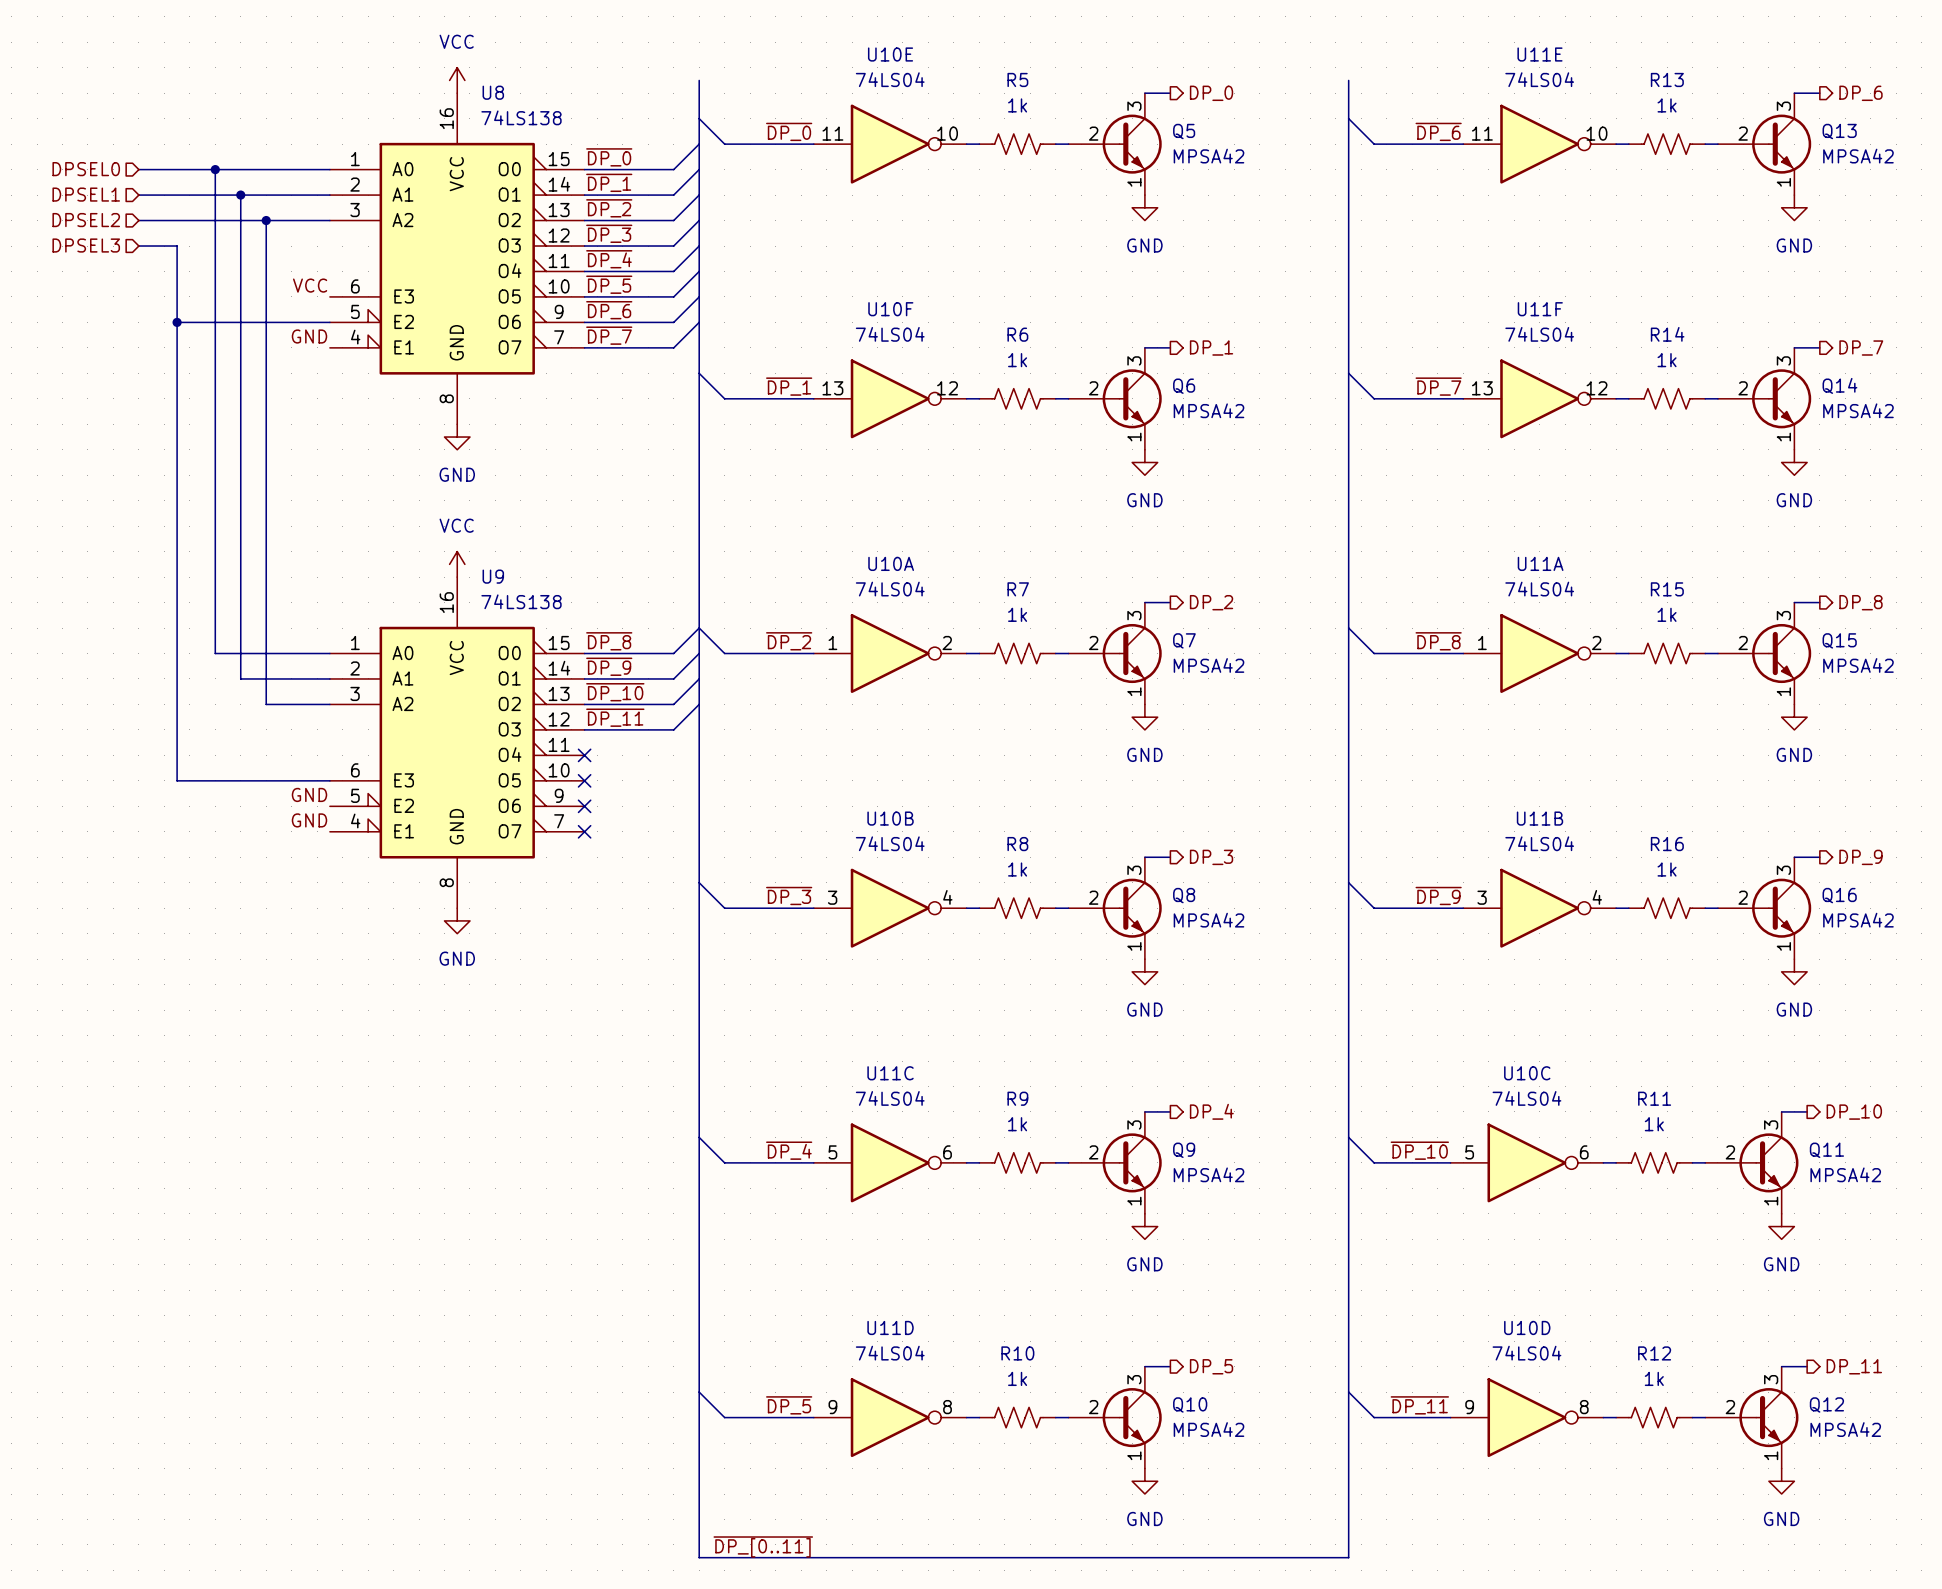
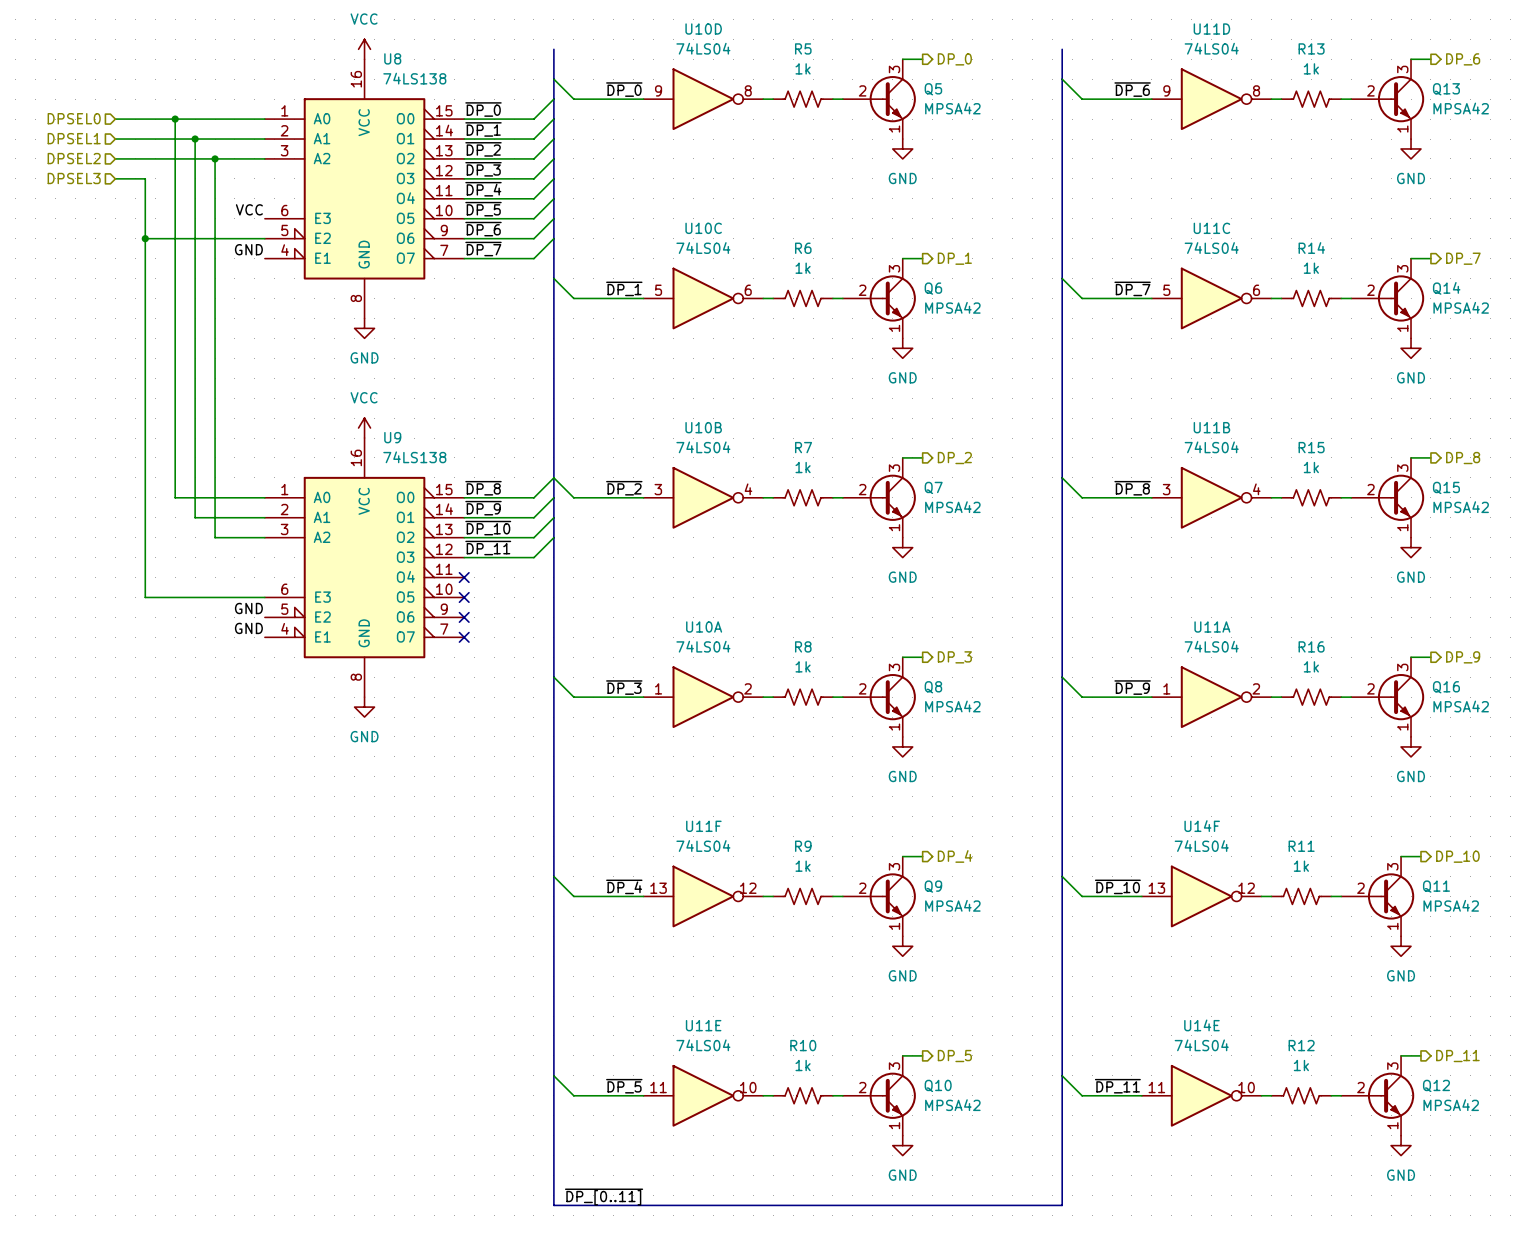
U10E: 74LS04 (890, 144) -> none
U11E position: (1539, 144) -> (703, 1095)
U10F: 74LS04 (890, 398) -> none
U11F position: (1539, 398) -> (703, 896)
U10A position: (890, 653) -> (703, 697)
U11A position: (1539, 653) -> (1211, 697)
U10B position: (890, 908) -> (703, 497)
U11B position: (1539, 908) -> (1211, 497)
U11C position: (890, 1162) -> (1211, 298)
U10C position: (1526, 1162) -> (703, 298)
U14F: none -> 74LS04 (1201, 896)
U11D position: (890, 1417) -> (1211, 99)
U10D position: (1526, 1417) -> (703, 99)
U14E: none -> 74LS04 (1201, 1095)

